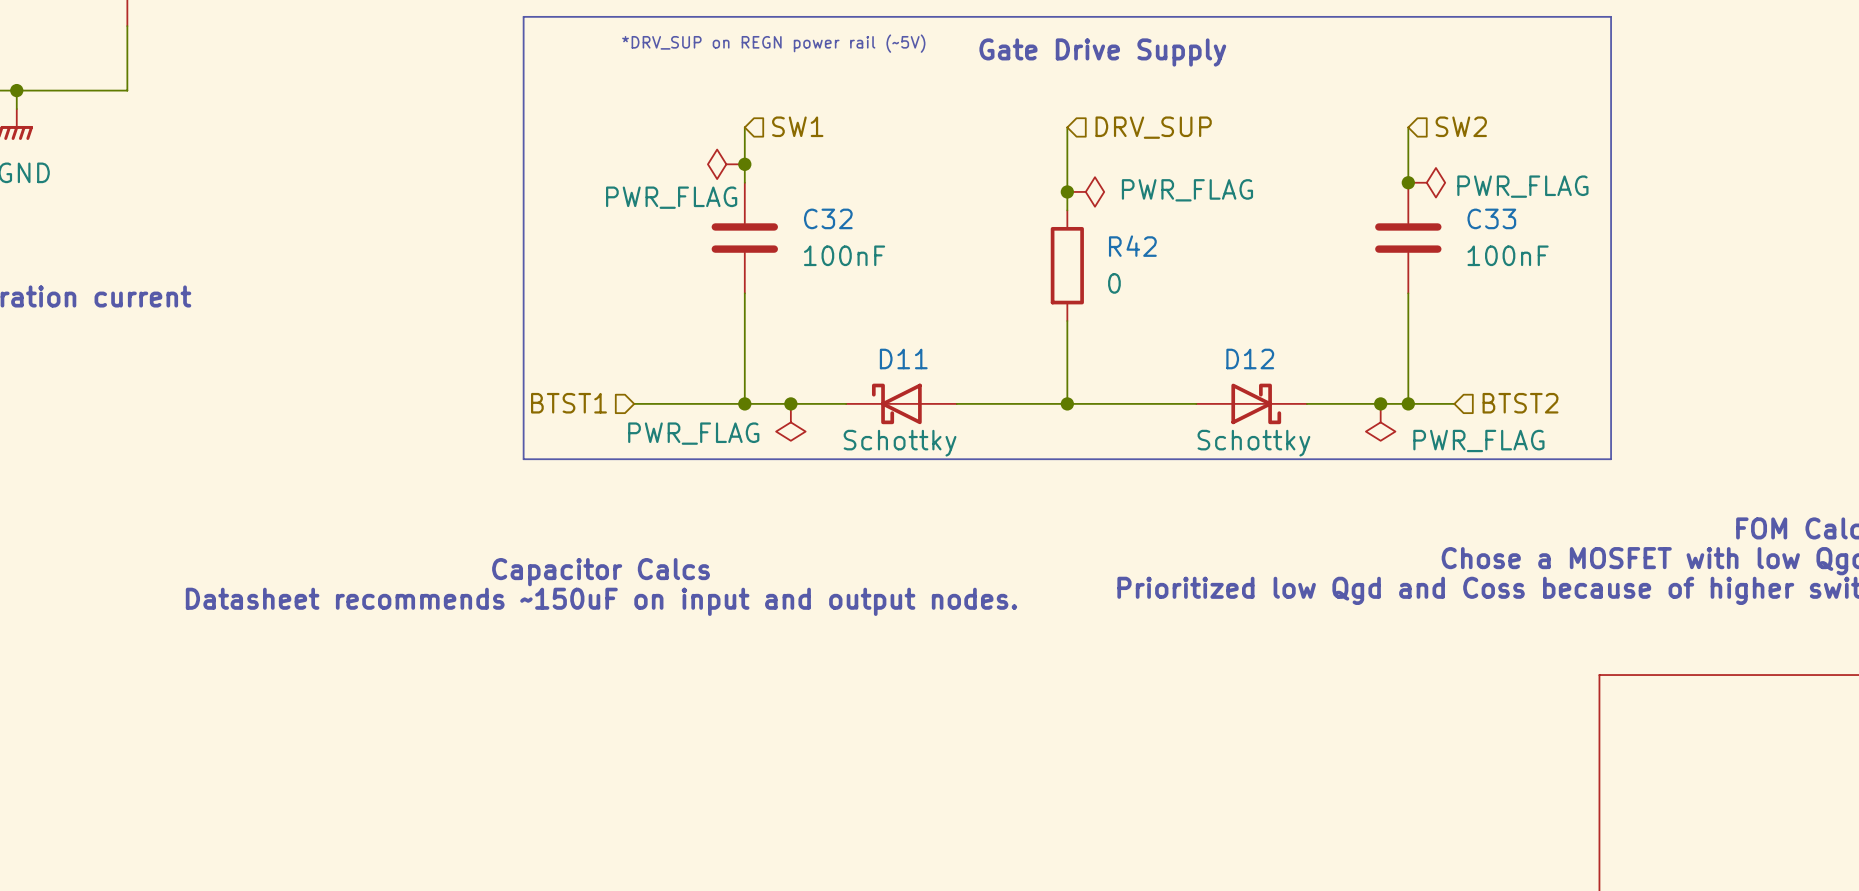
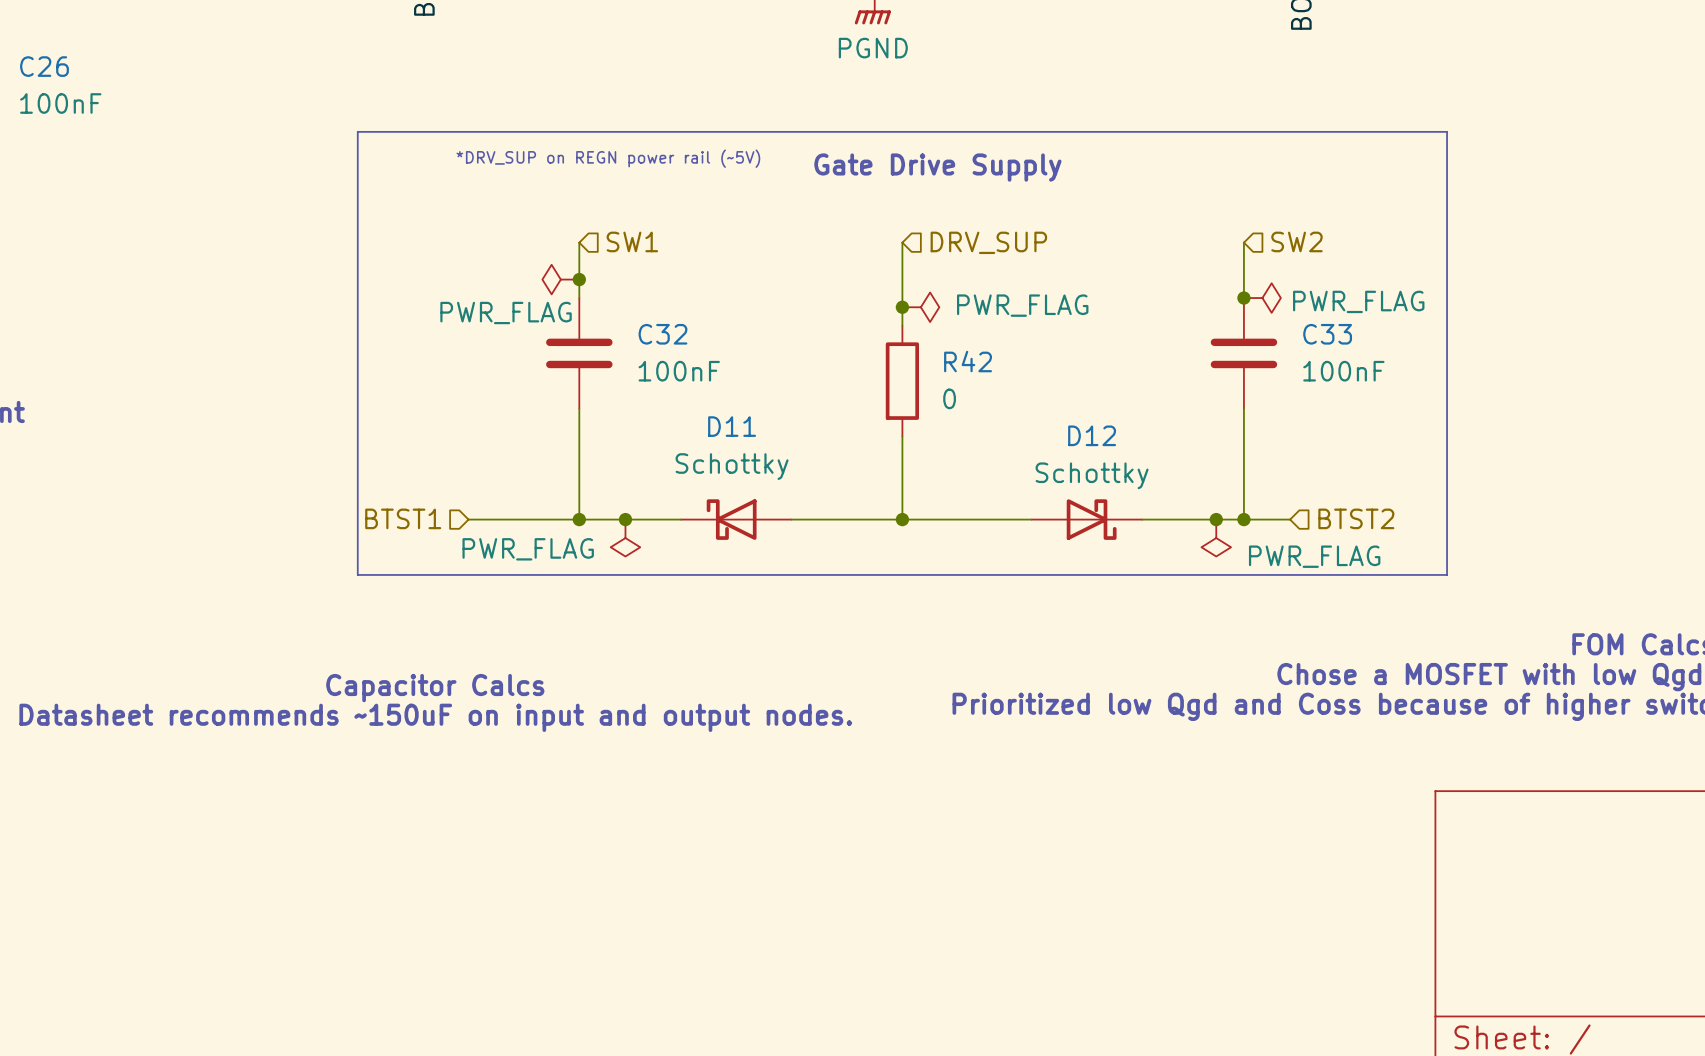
D11 name position: D11 (903, 358) -> D11 (732, 426)
D12 name position: D12 (1250, 358) -> D12 (1092, 435)
D11 value position: Schottky (900, 443) -> Schottky (732, 466)
D12 value position: Schottky (1253, 443) -> Schottky (1092, 475)

